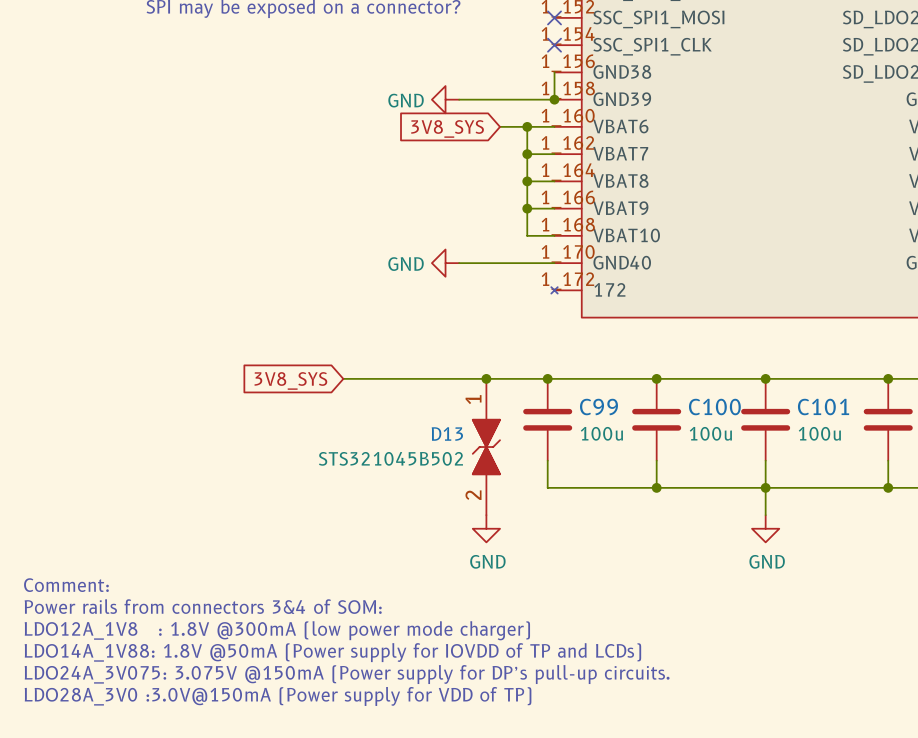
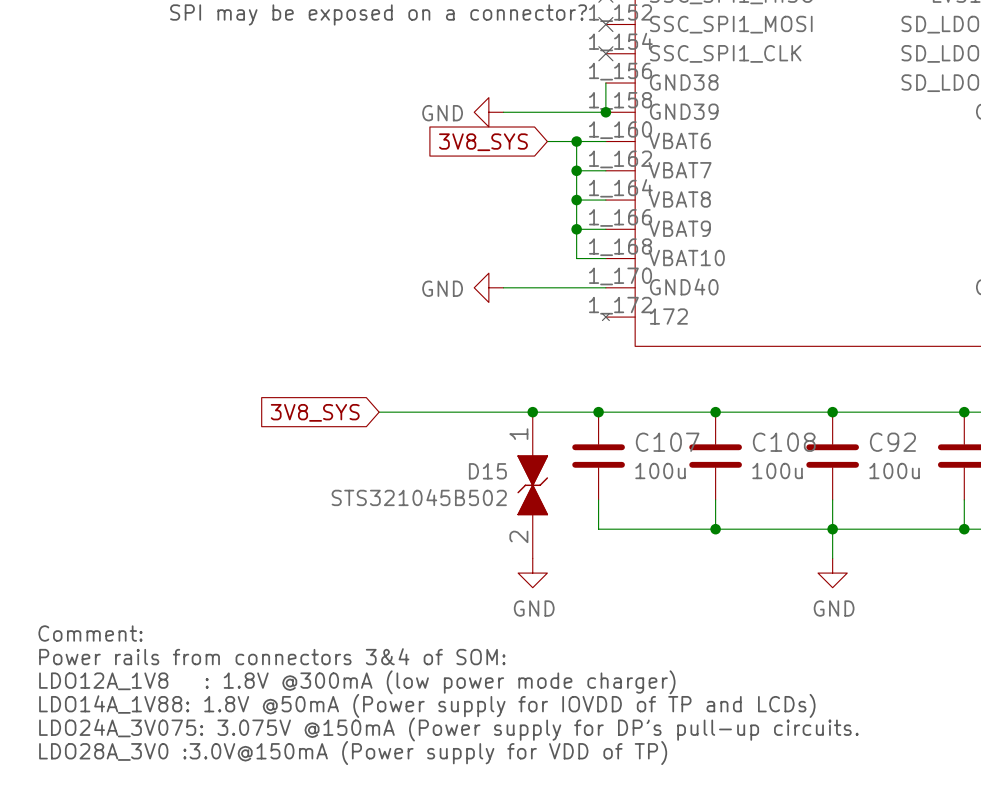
C100 name: C100 (714, 406) -> C108 (784, 442)
C101 name: C101 (823, 406) -> C92 (892, 442)
C99 name: C99 (598, 407) -> C107 (667, 442)
D13 name: D13 (447, 433) -> D15 (487, 471)

